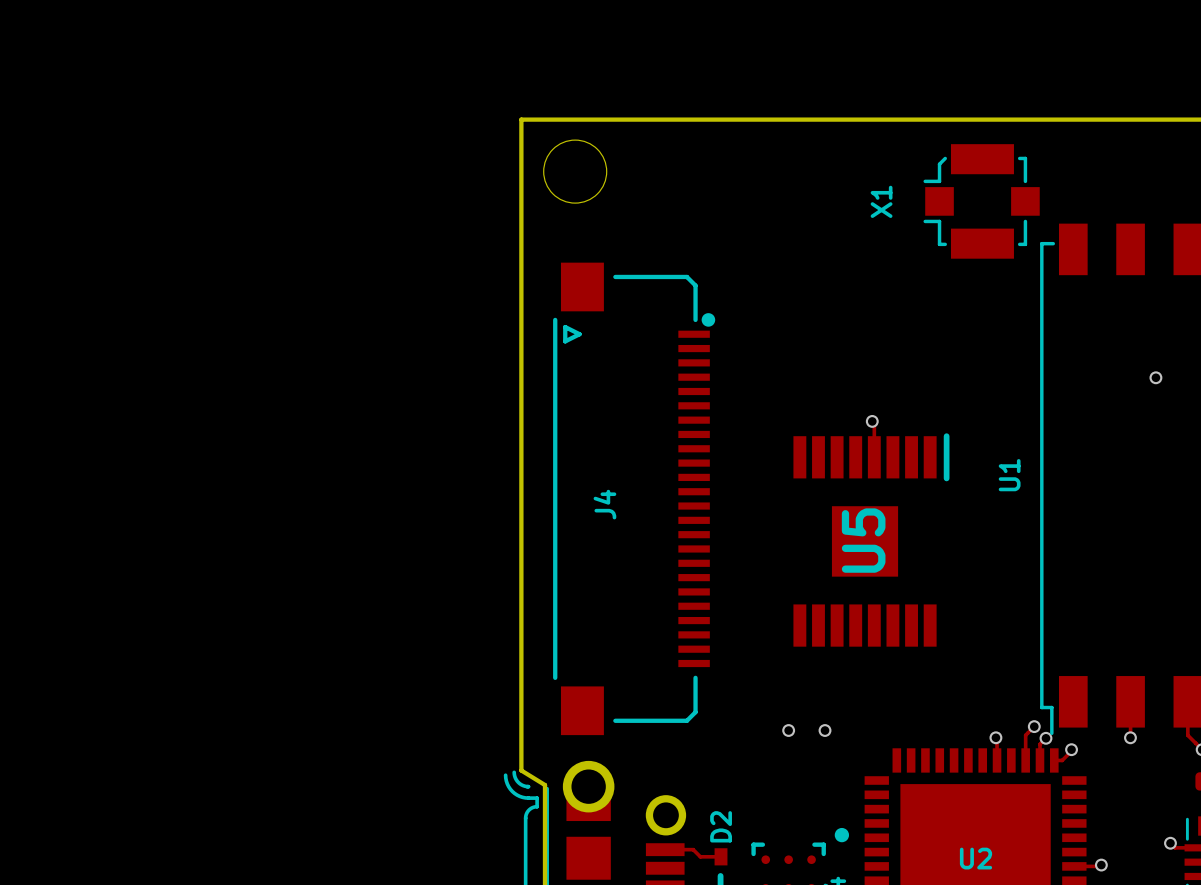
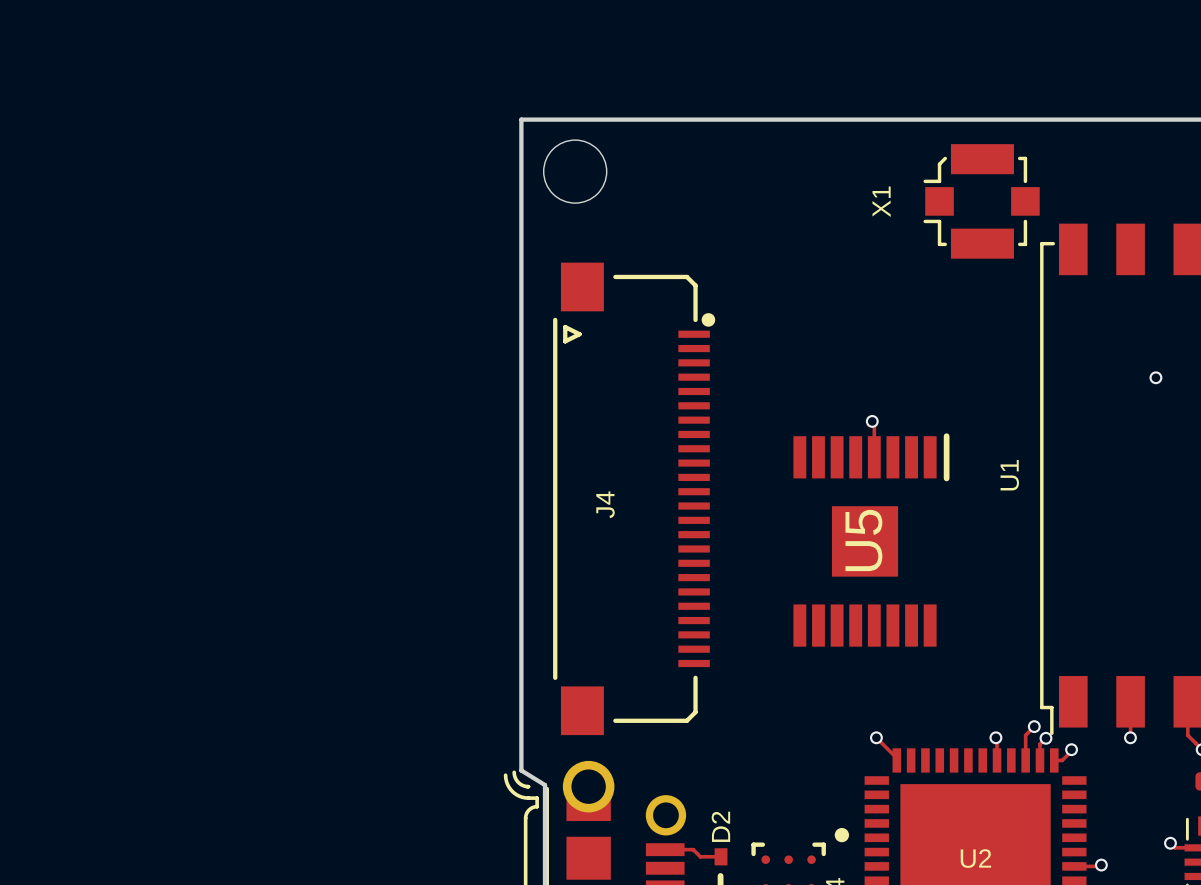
via: (788, 730) -> none
via: (825, 730) -> none
track: none -> (876, 737) (896, 758) (896, 760)
via: none -> (876, 737)

